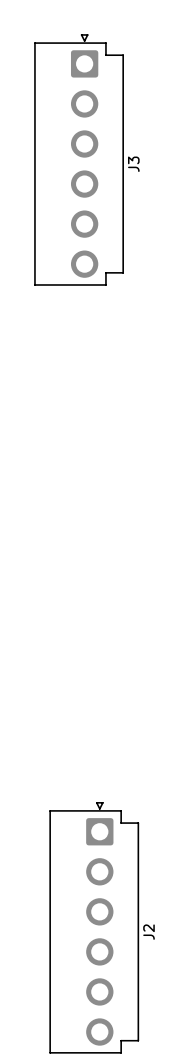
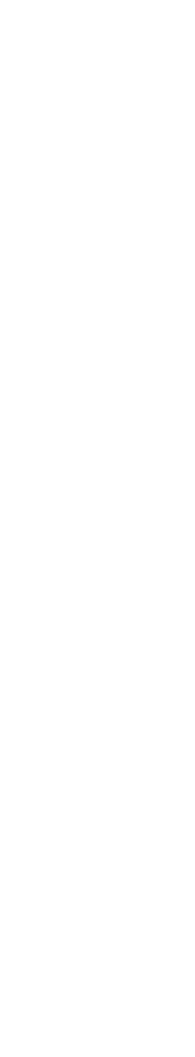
J3: (79, 159) -> none
J2: (94, 927) -> none

